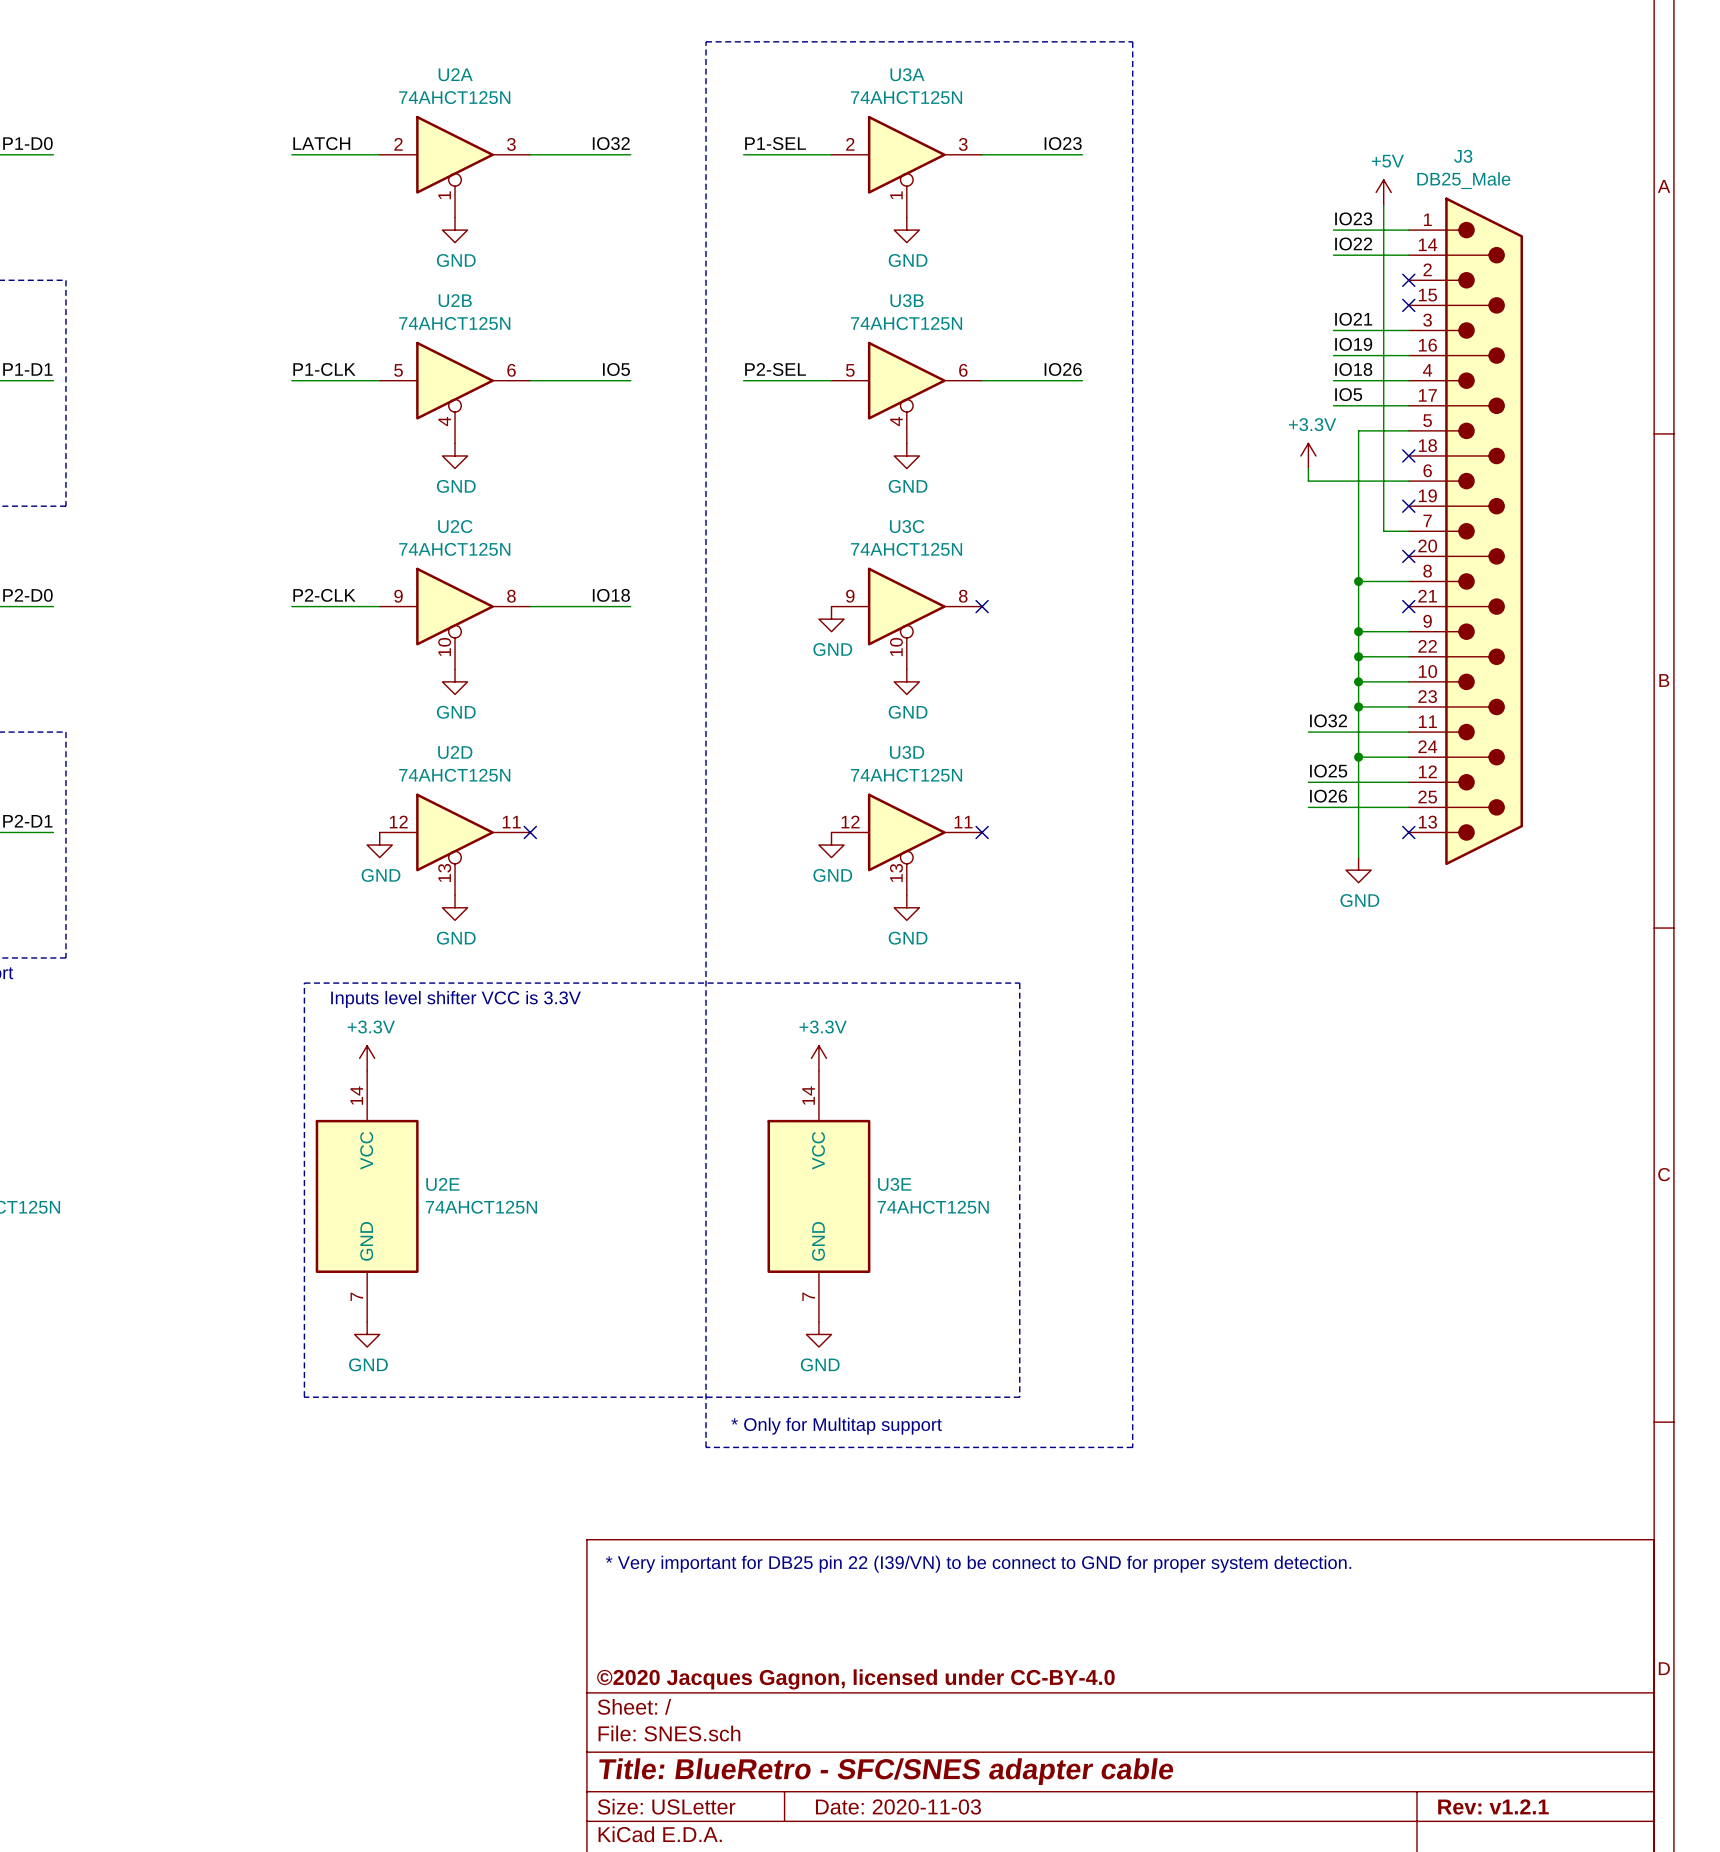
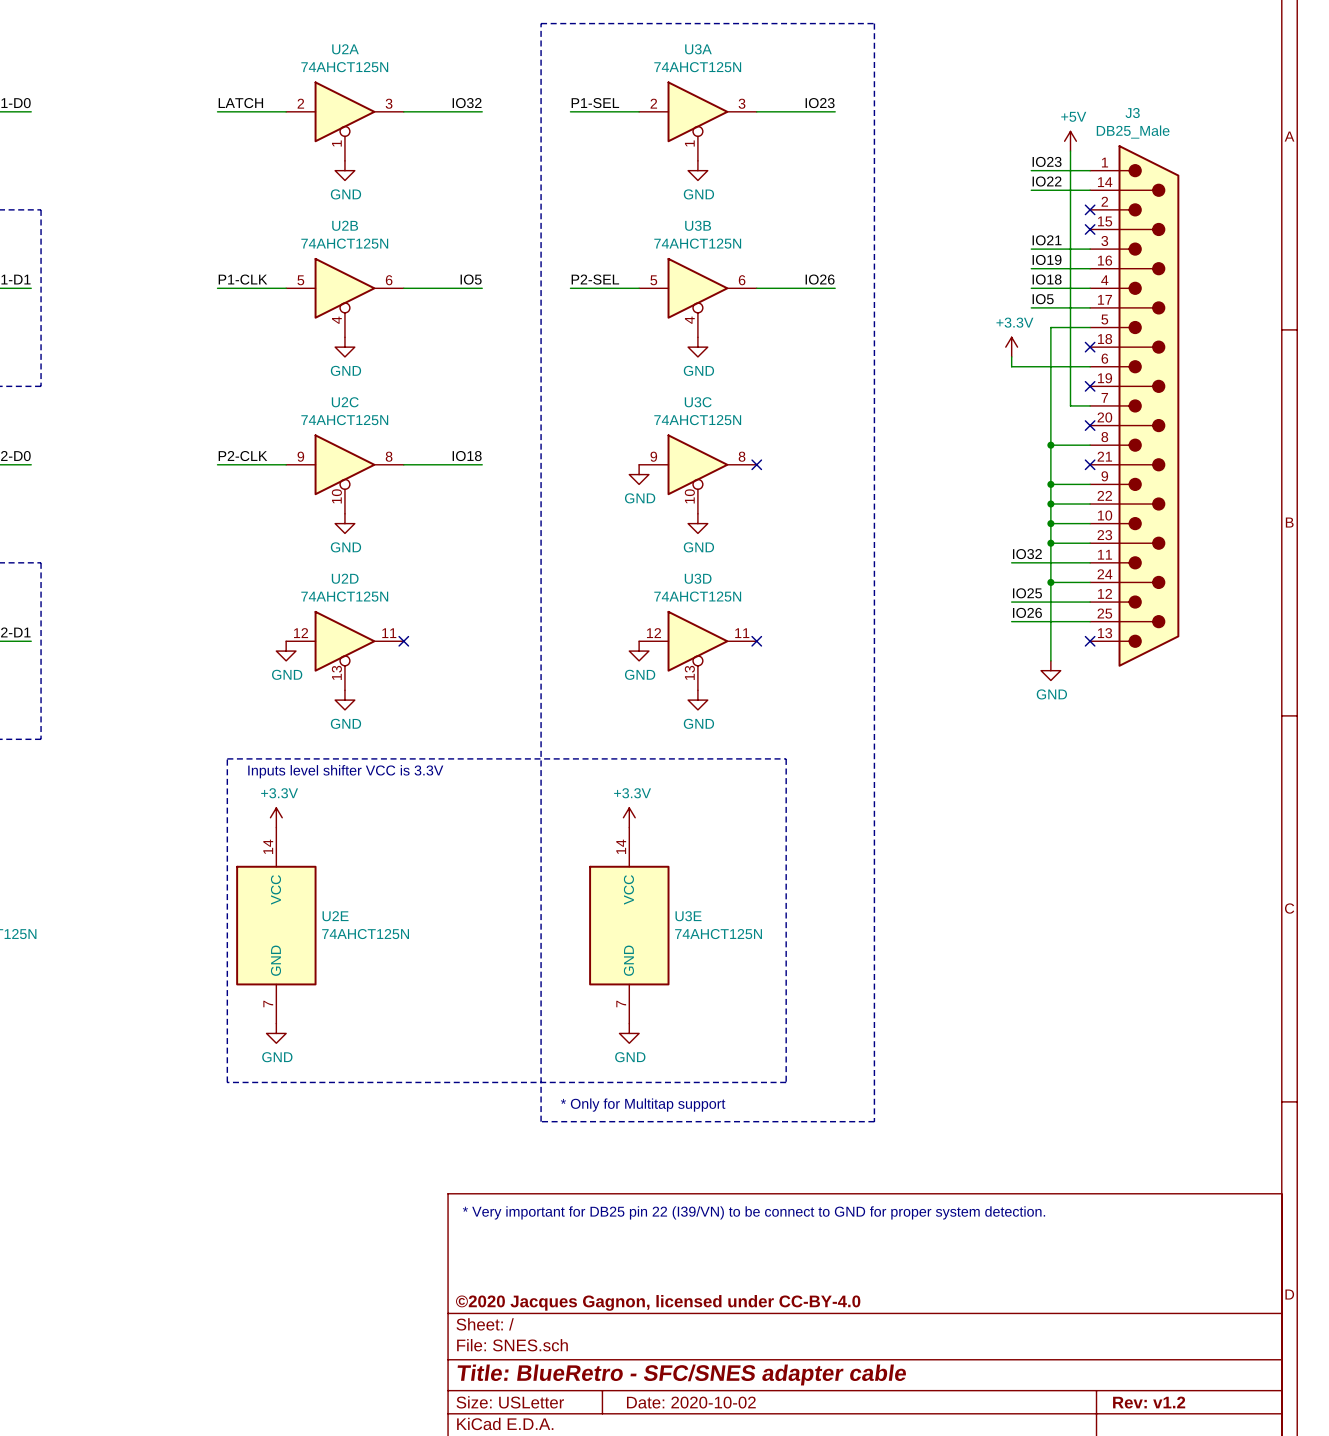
title block: Date: 2020-11-03 (898, 1806) -> Date: 2020-10-02 (691, 1402)
title block: Rev: v1.2.1 (1493, 1806) -> Rev: v1.2 (1149, 1402)

